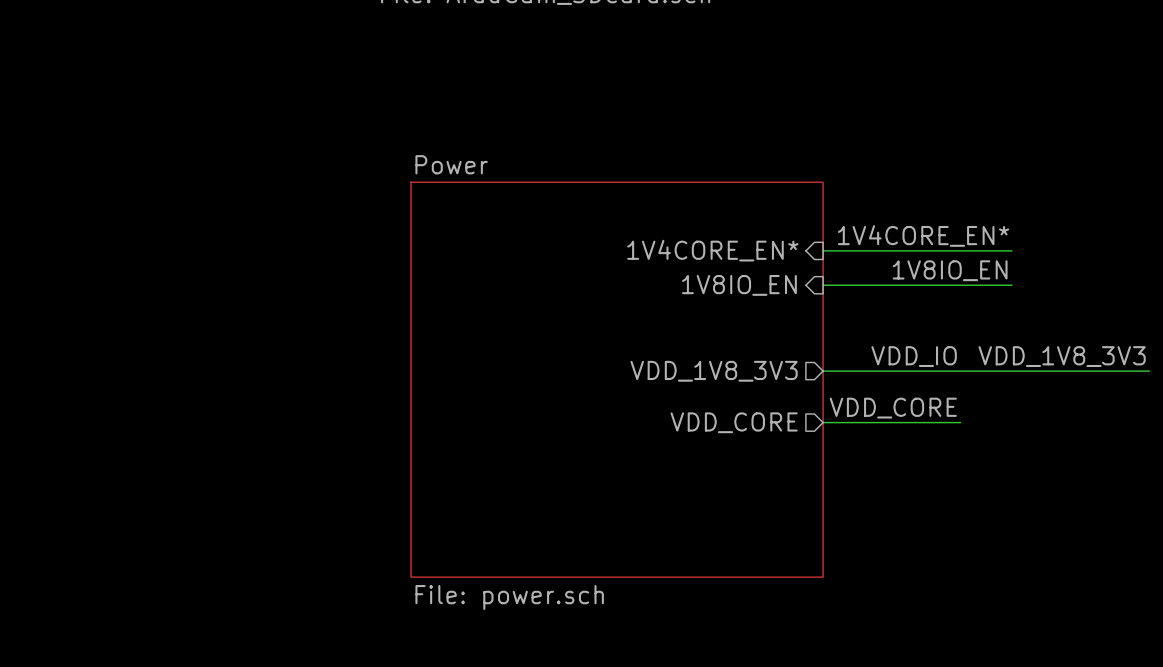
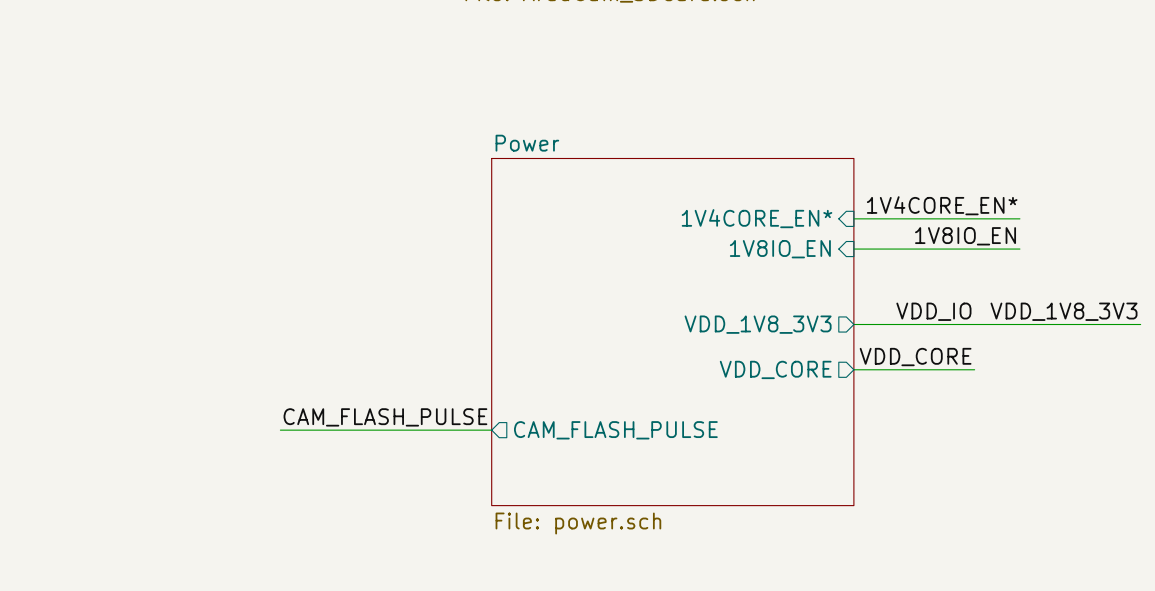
label: none -> CAM_FLASH_PULSE (385, 417)
wire: none -> (280, 430) (491, 430)
sheet pin: none -> CAM_FLASH_PULSE (615, 430)

